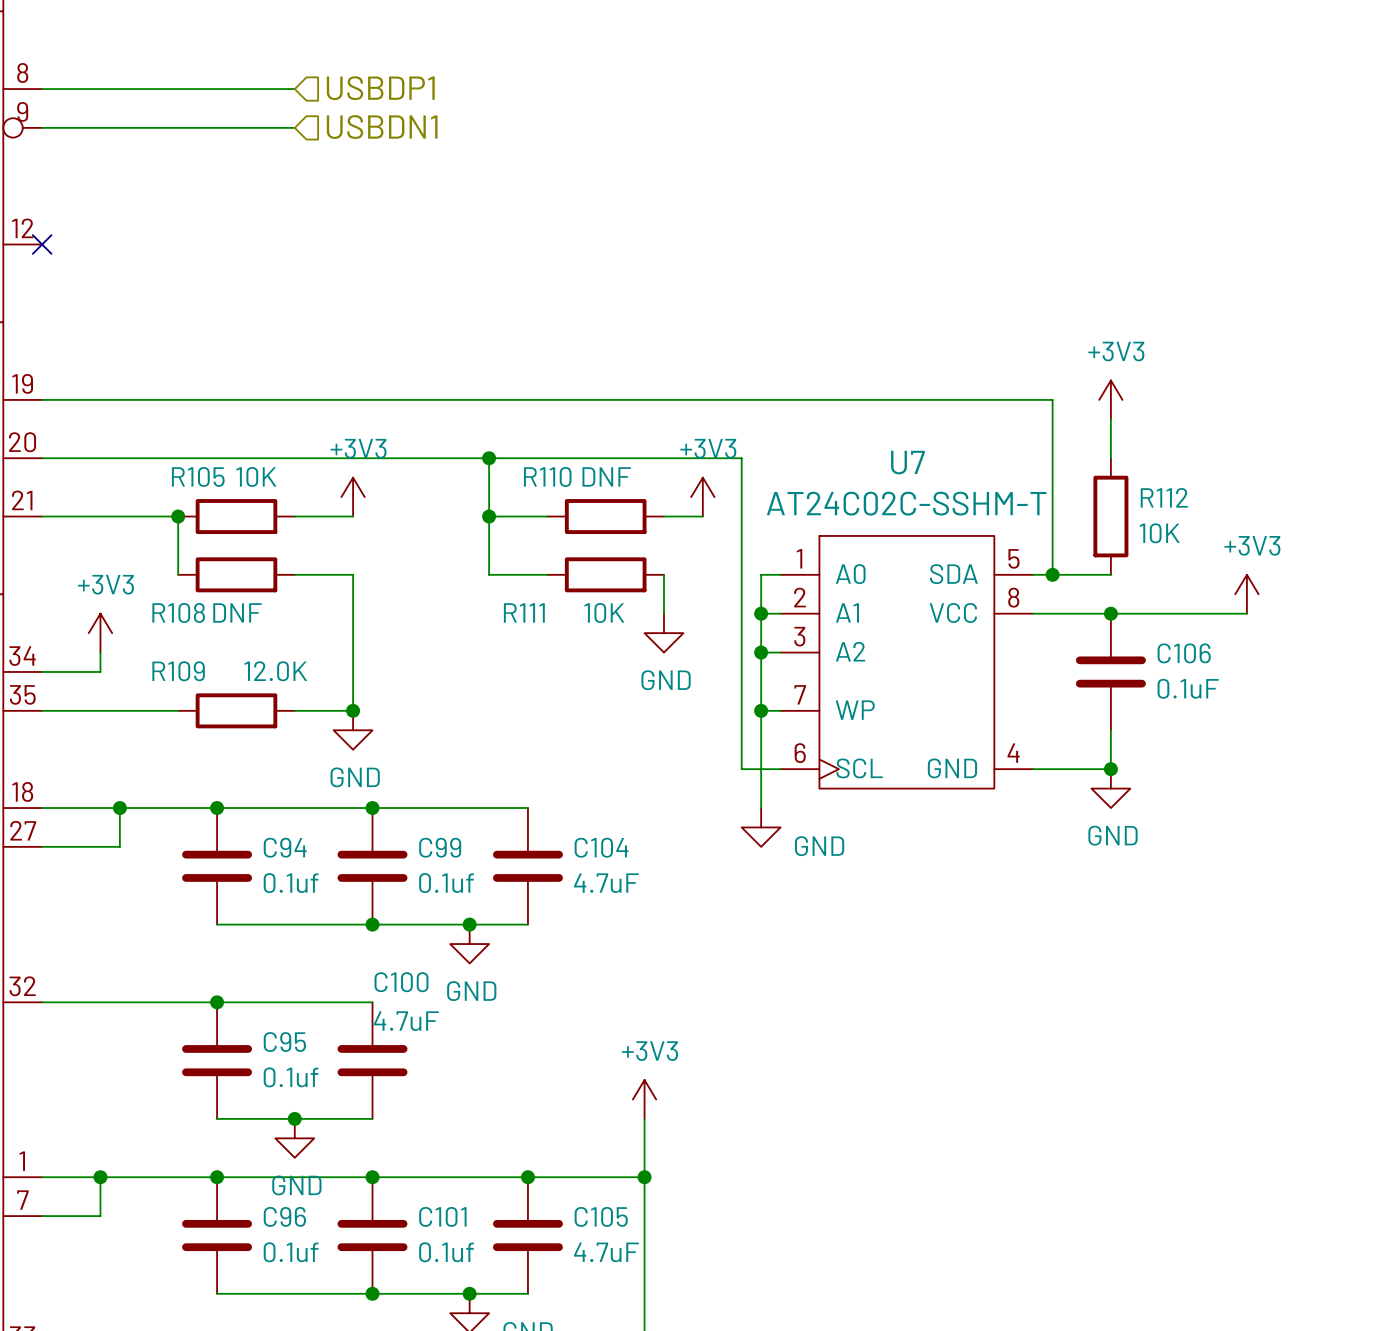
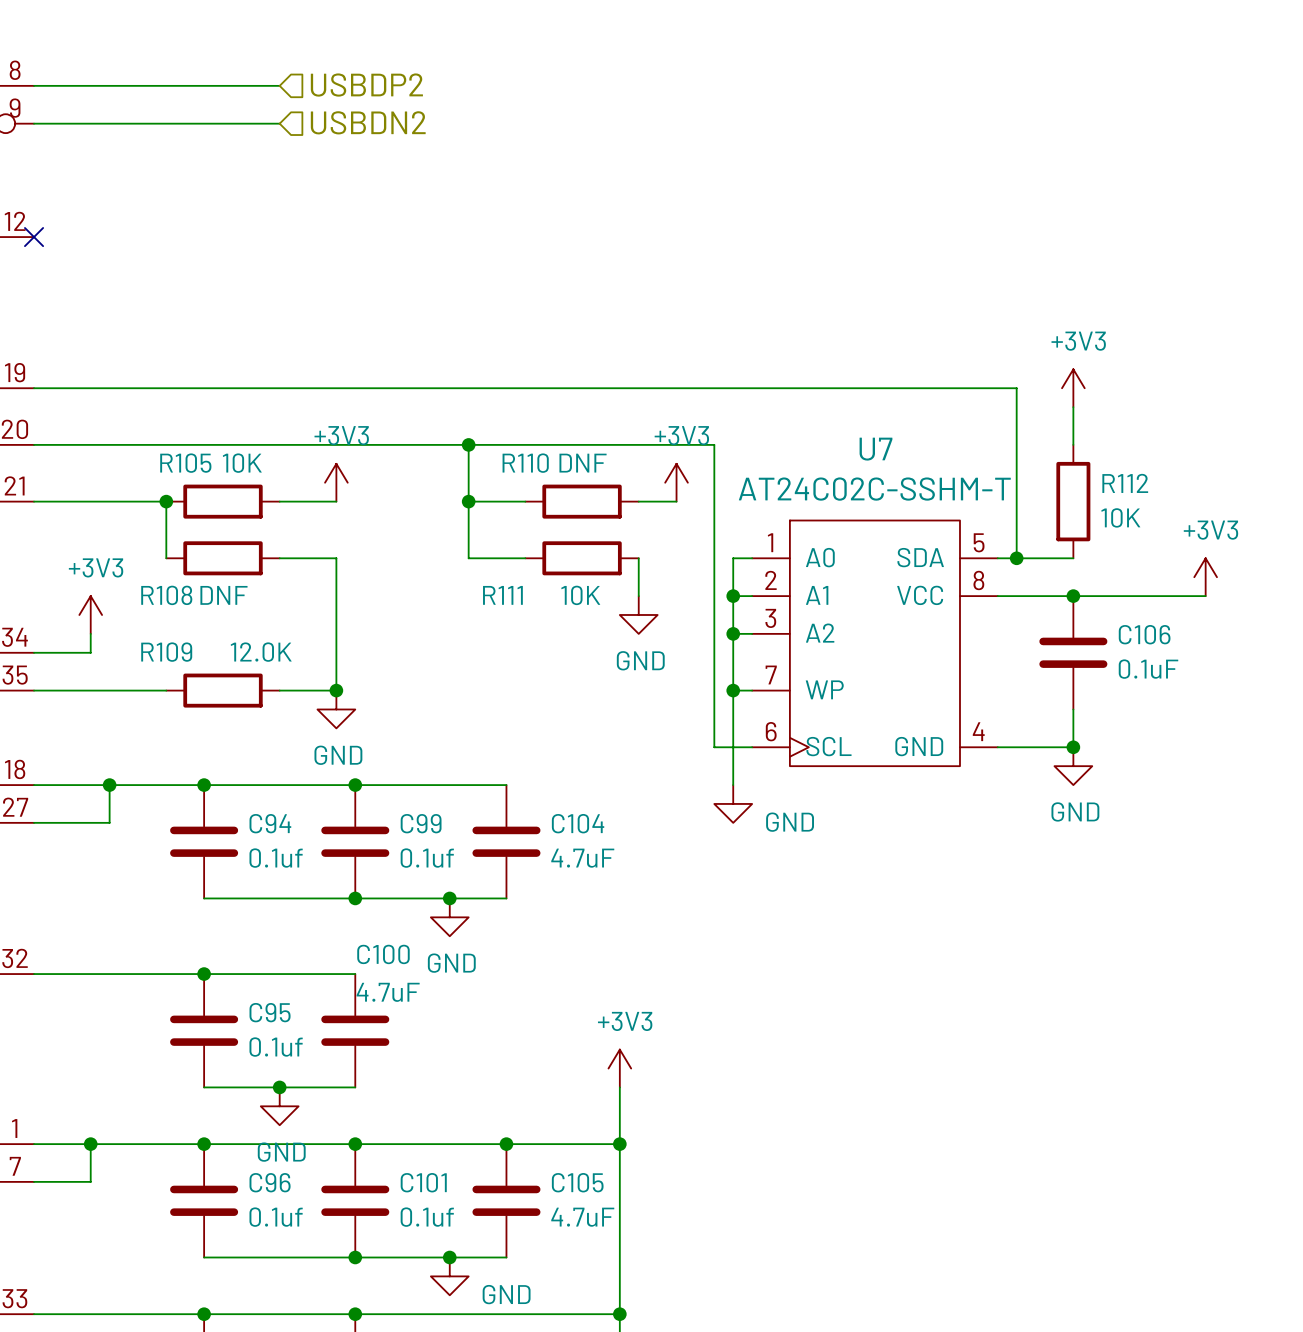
hierarchical label: USBDP1 (380, 88) -> USBDP2 (366, 85)
hierarchical label: USBDN1 (382, 127) -> USBDN2 (368, 122)

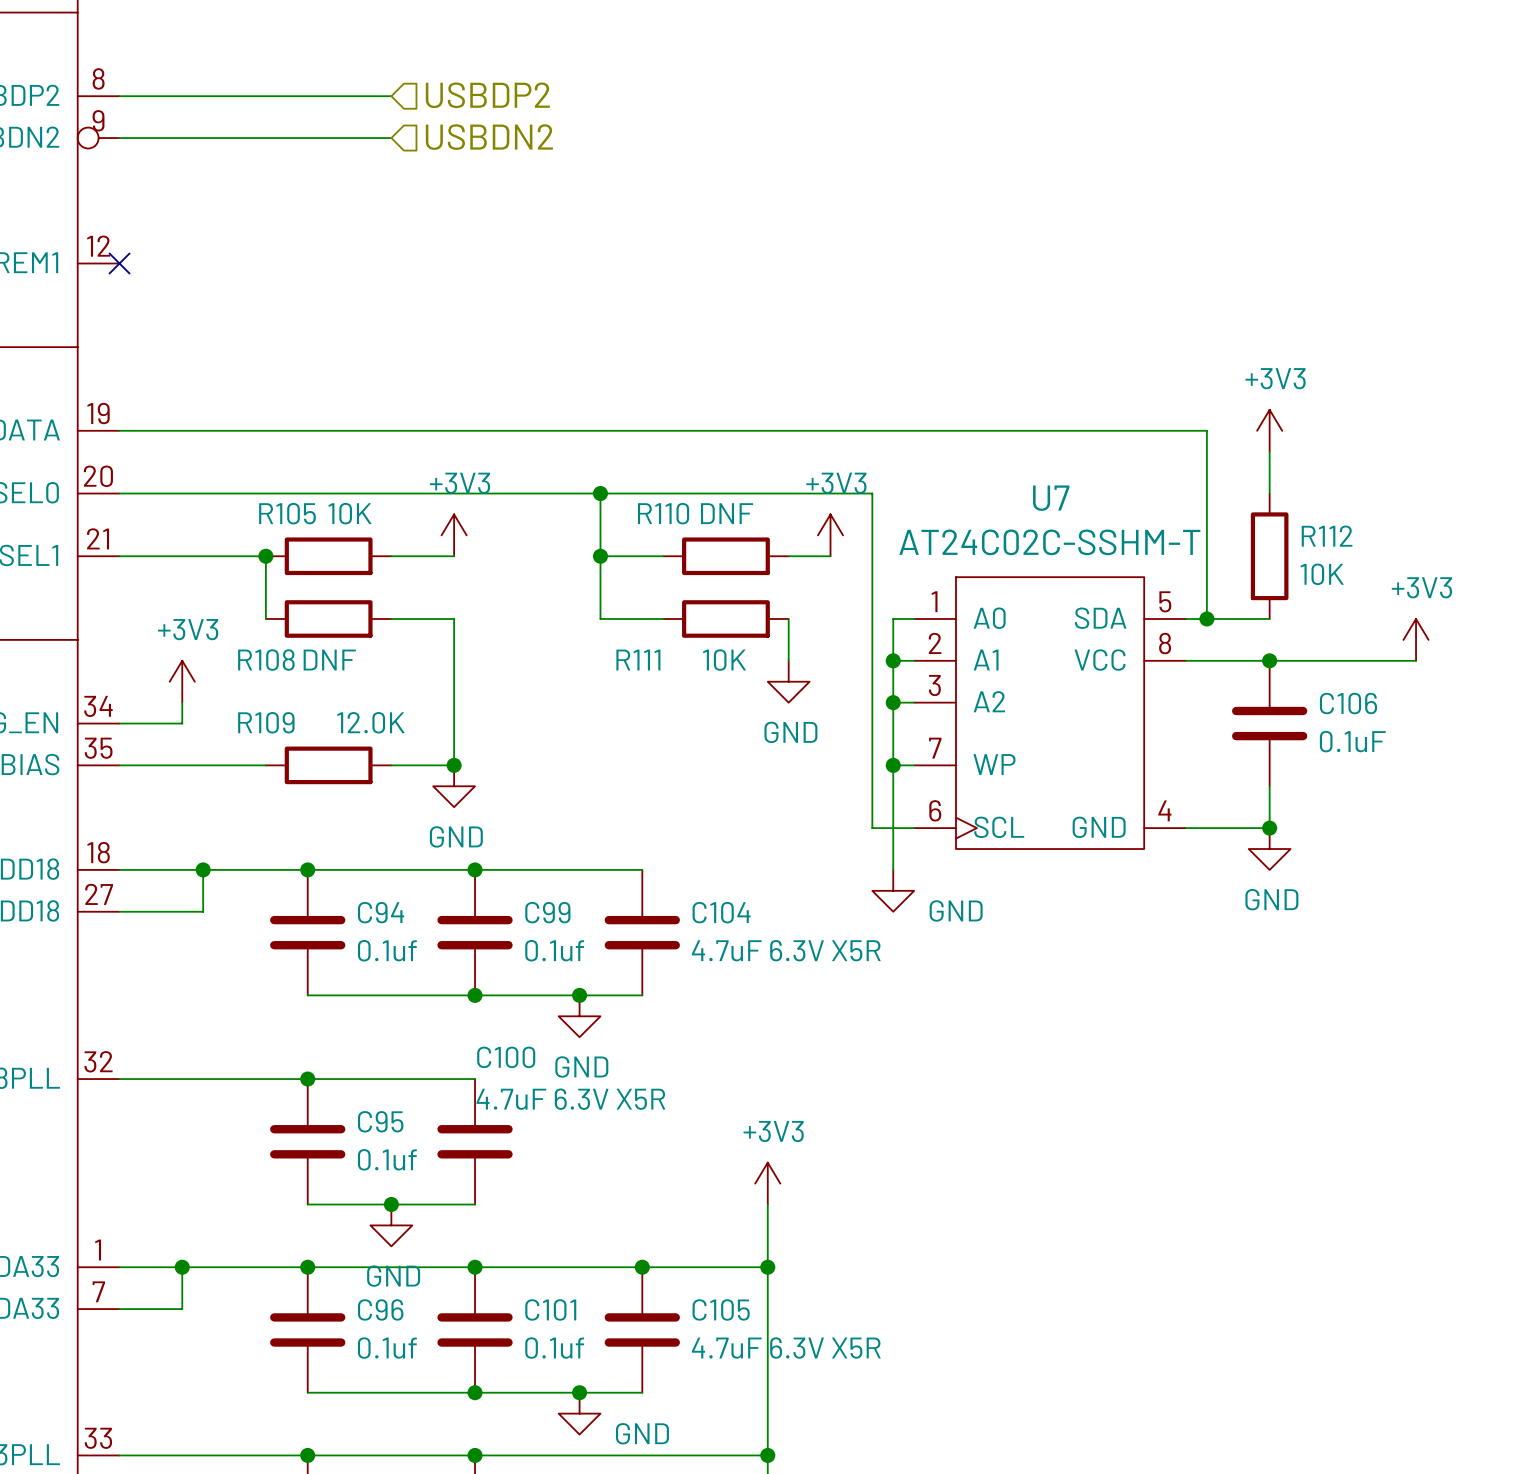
C104 value: 4.7uF (582, 858) -> 4.7uF 6.3V X5R (786, 950)
C100 value: 4.7uF (388, 992) -> 4.7uF 6.3V X5R (570, 1099)
C105 value: 4.7uF (582, 1217) -> 4.7uF 6.3V X5R (786, 1348)

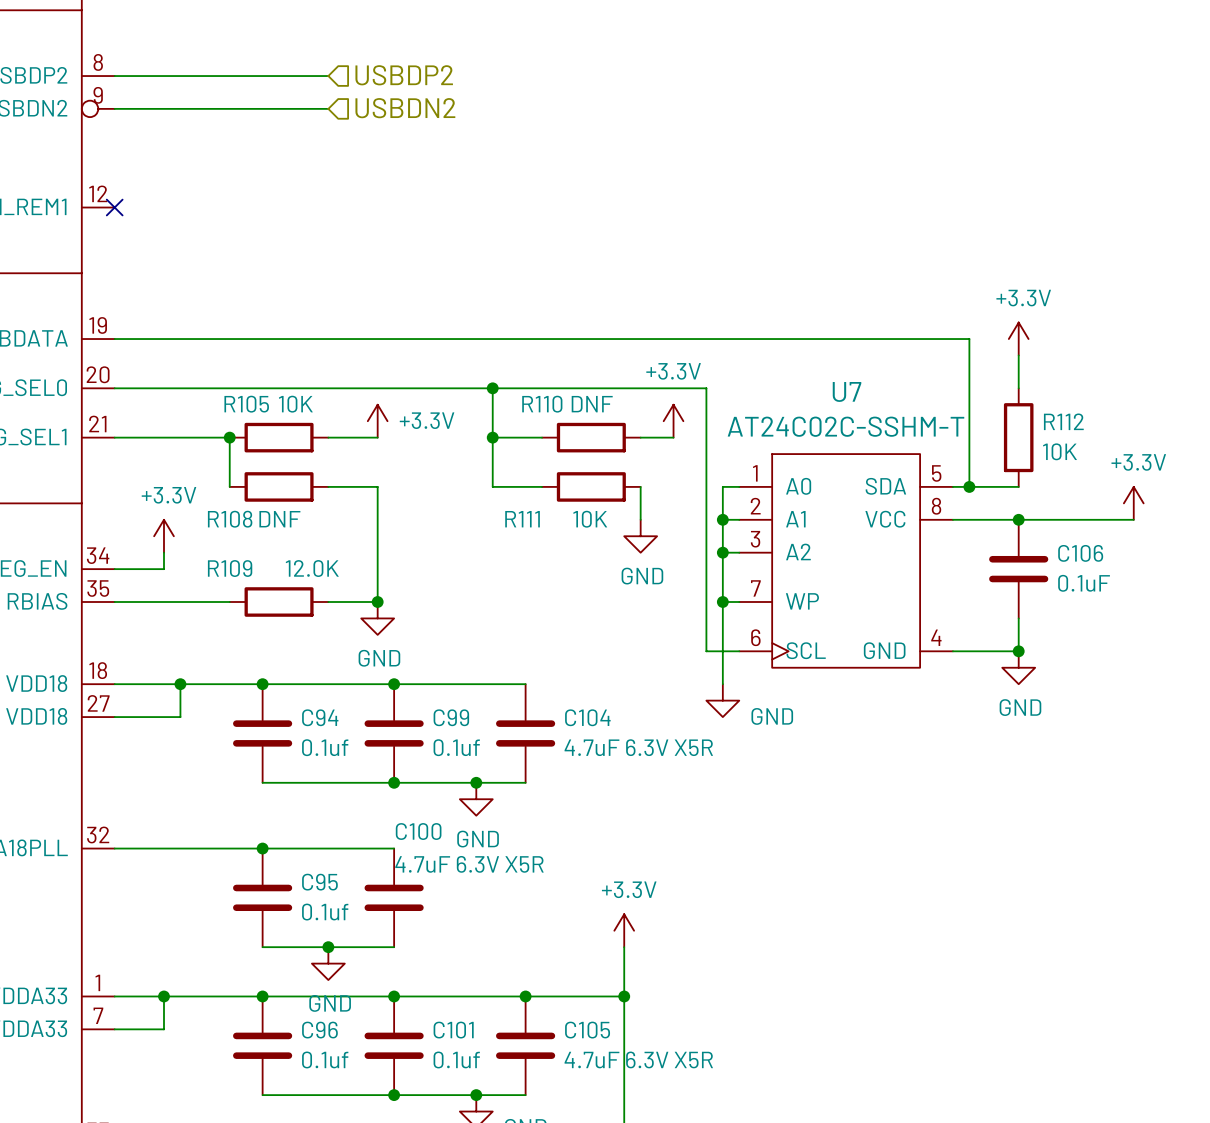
power symbol: +3V3 (1269, 430) -> +3.3V (1018, 339)
power symbol: +3V3 (454, 535) -> +3.3V (377, 421)
power symbol: +3V3 (830, 535) -> +3.3V (673, 421)
power symbol: +3V3 (1416, 639) -> +3.3V (1133, 503)
power symbol: +3V3 (182, 681) -> +3.3V (163, 536)
power symbol: +3V3 (767, 1183) -> +3.3V (624, 930)

